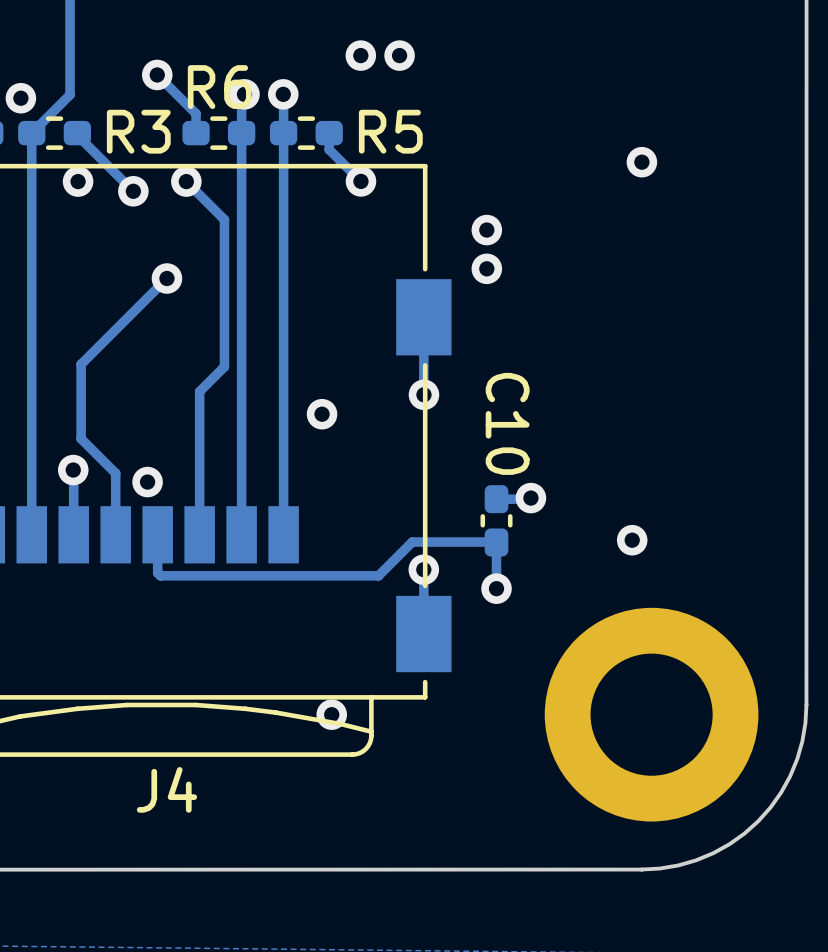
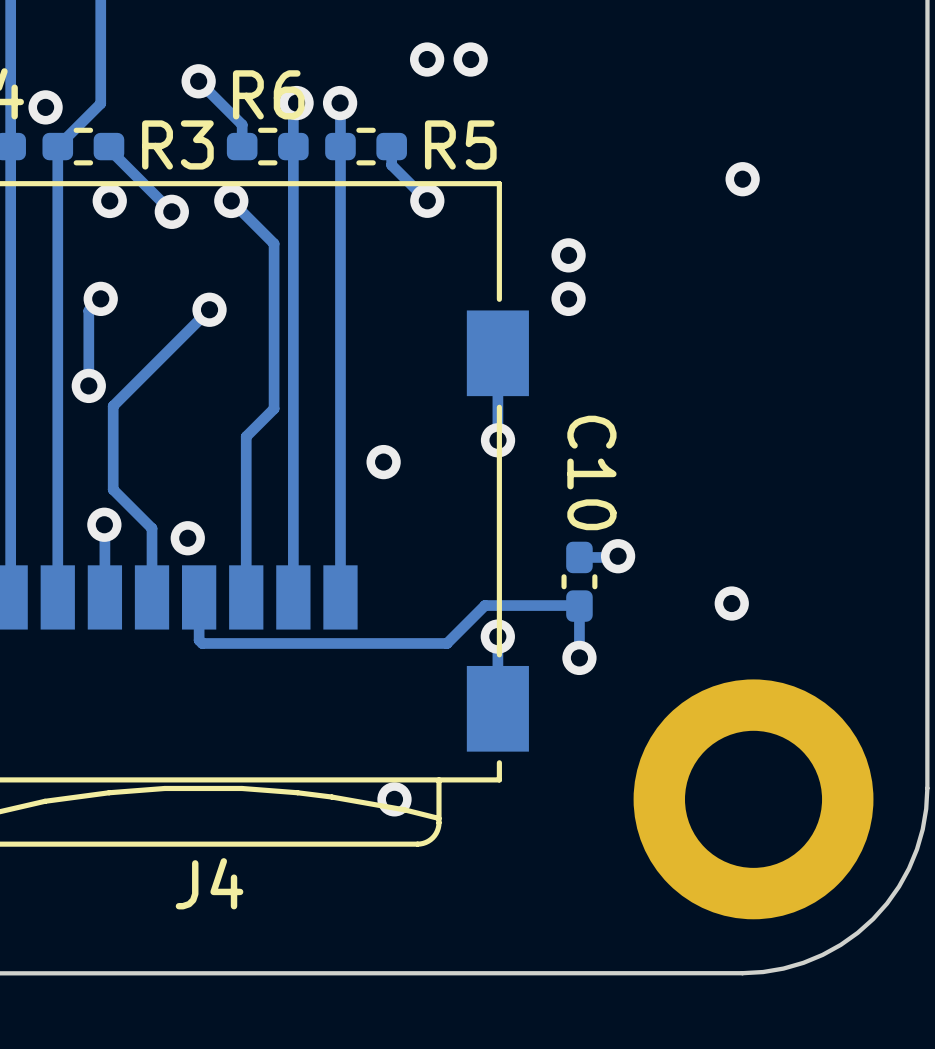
track: none -> (100, 298) (88, 310) (88, 385)
via: none -> (100, 298)
via: none -> (88, 385)

